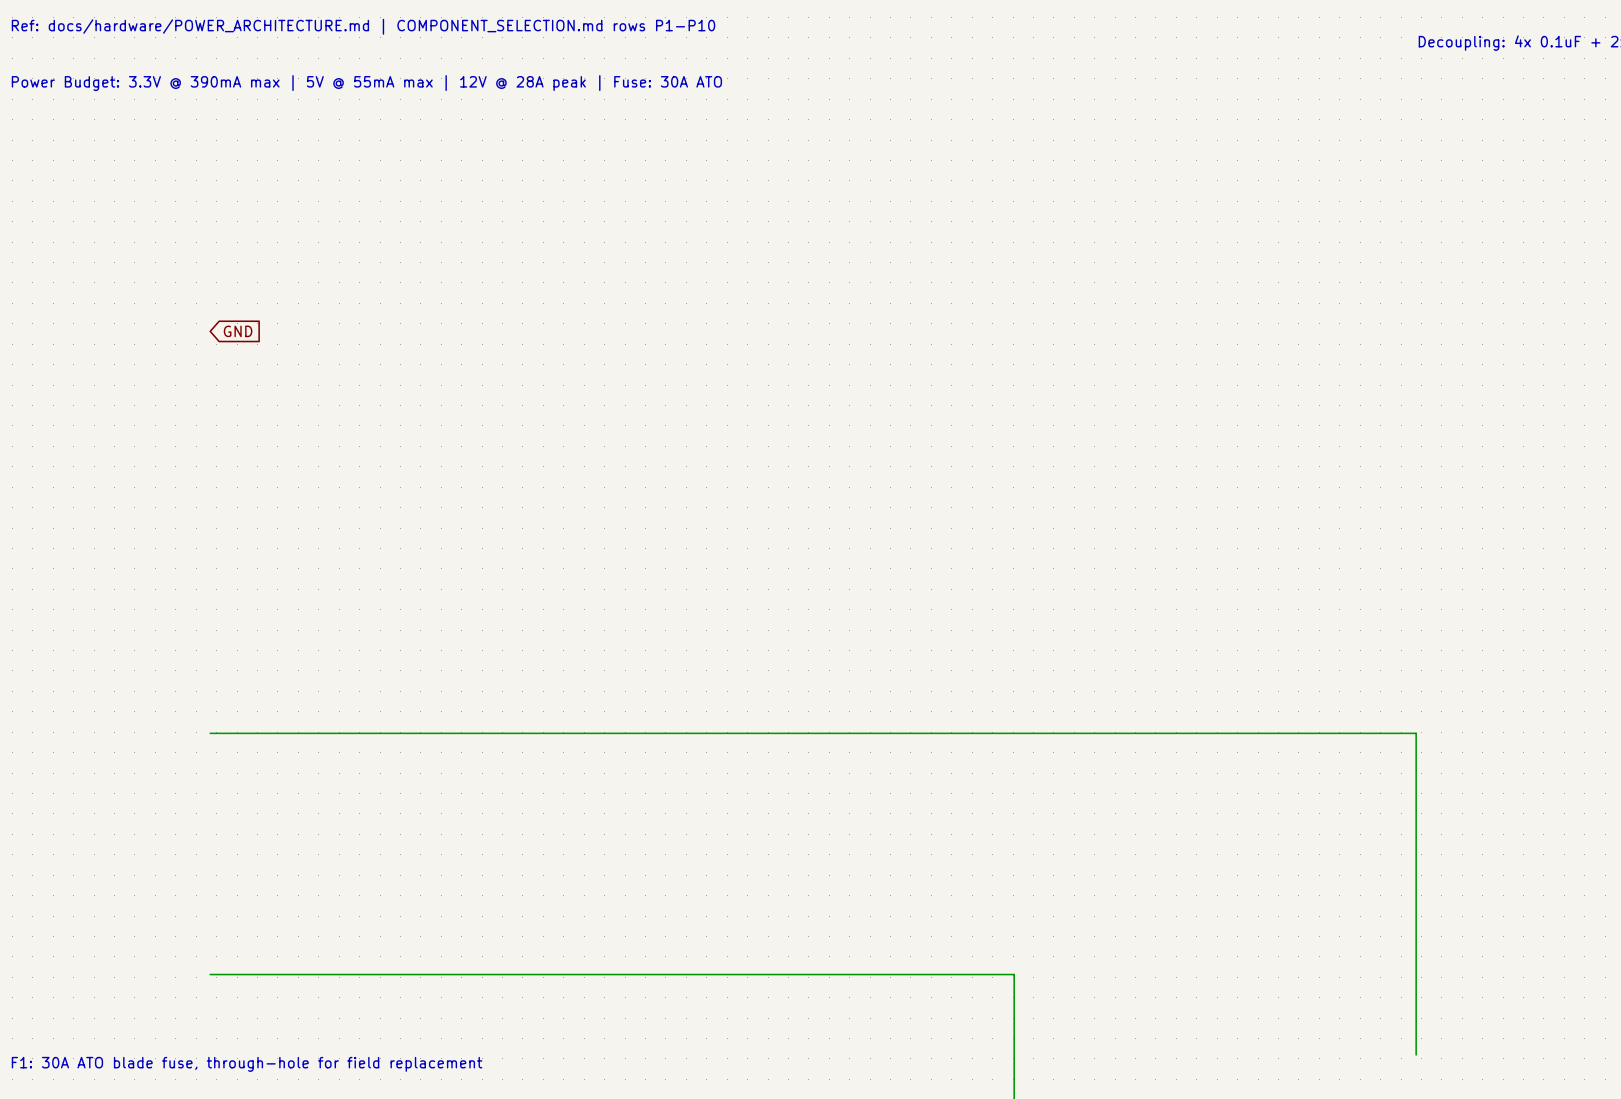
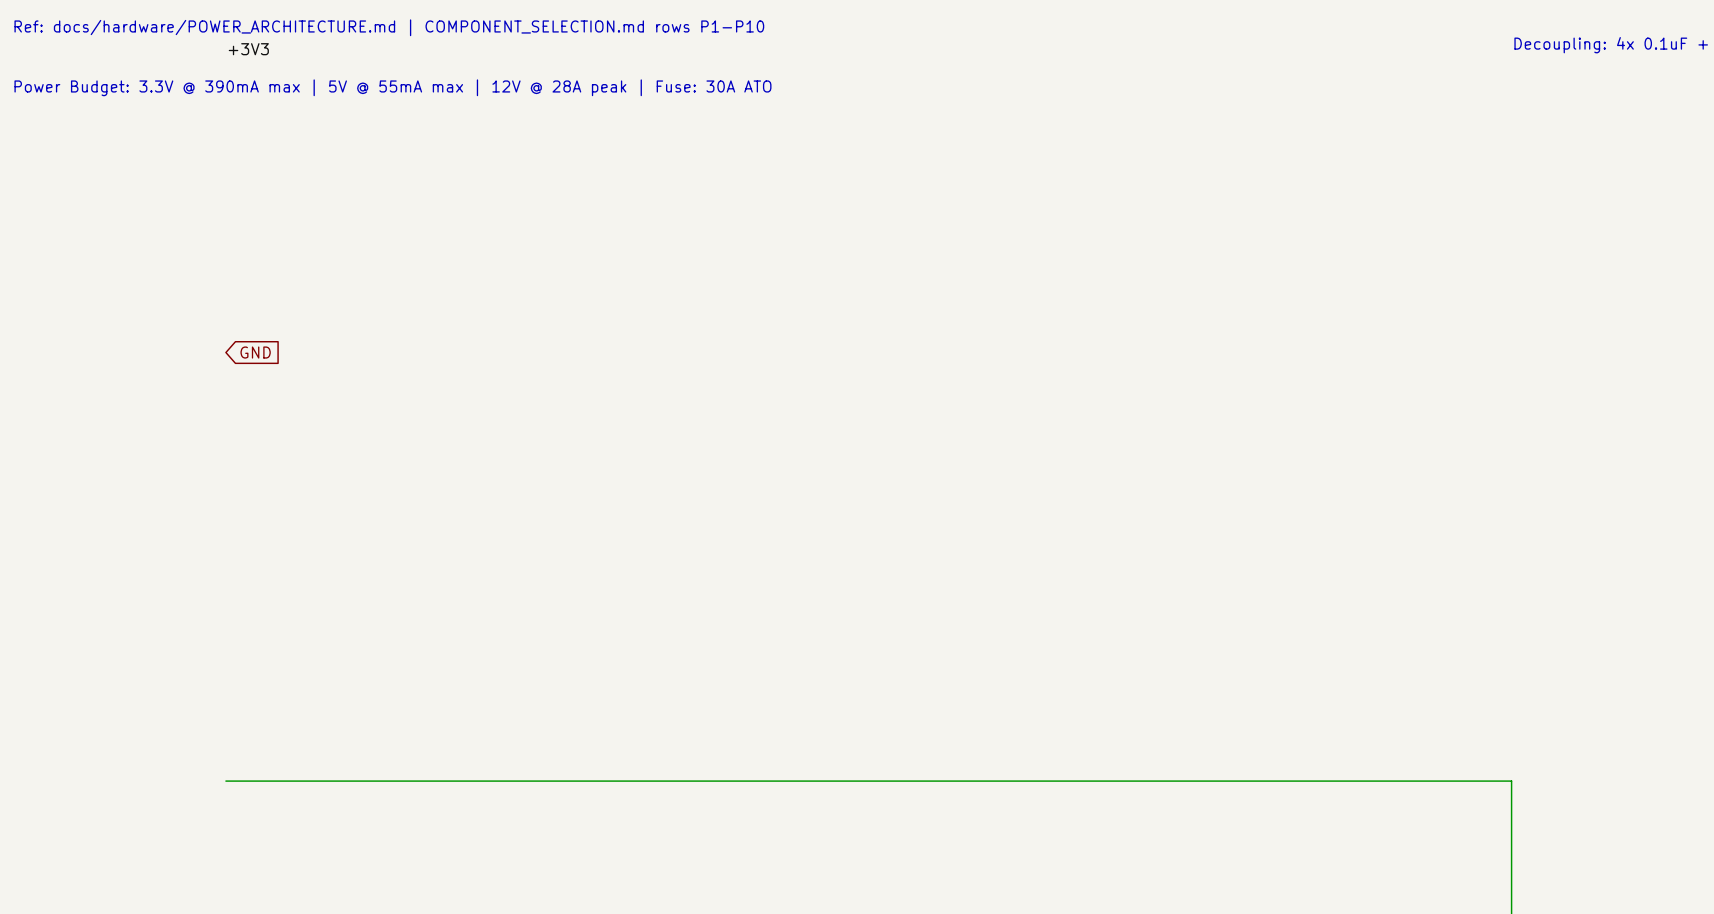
label: none -> +3V3 (248, 49)

